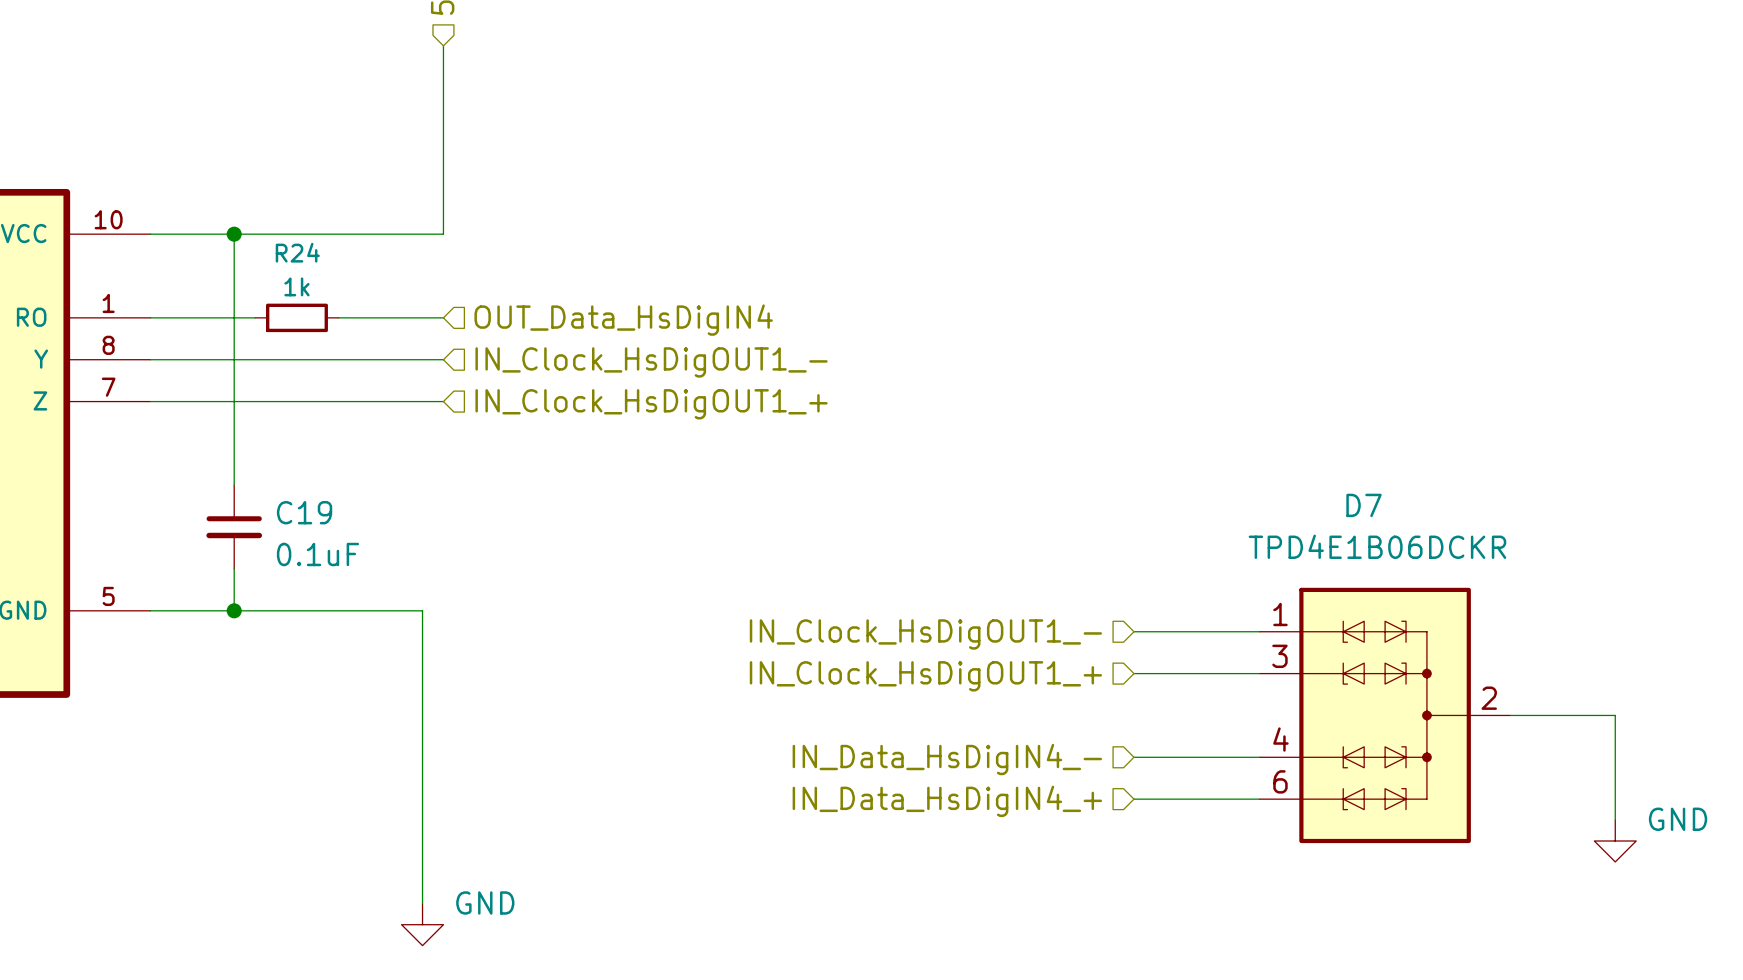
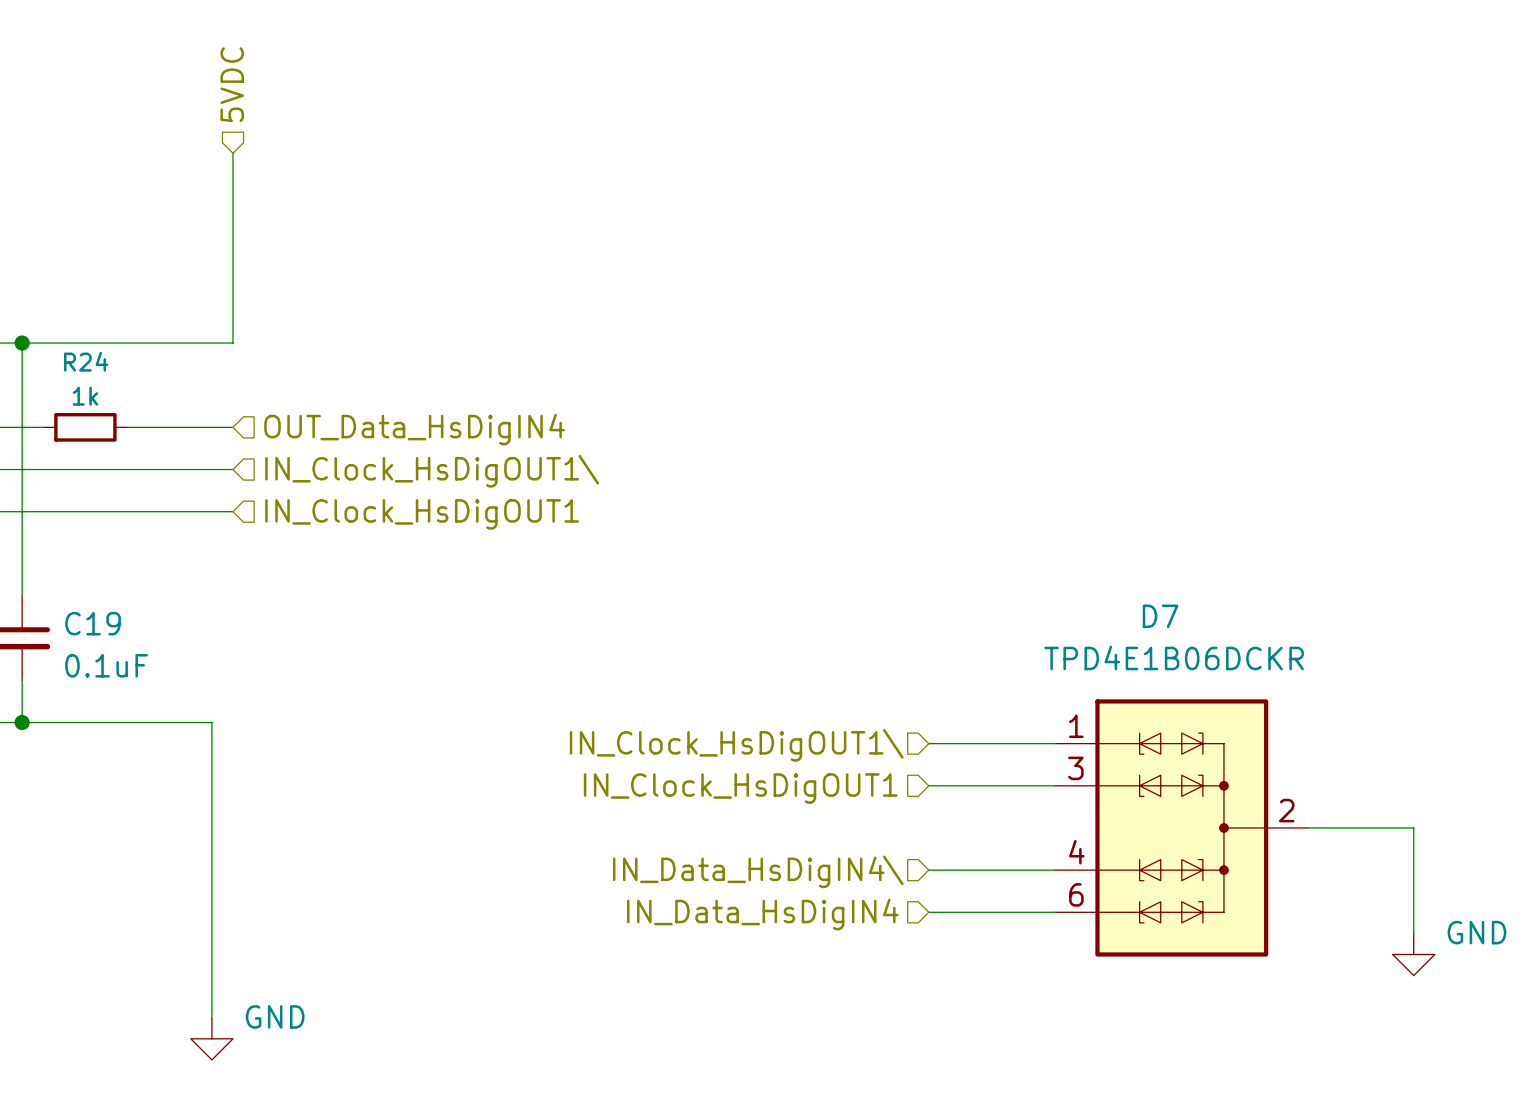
hierarchical label: IN_Clock_HsDigOUT1_- (651, 362) -> IN_Clock_HsDigOUT1\ (432, 471)
hierarchical label: IN_Clock_HsDigOUT1_+ (651, 404) -> IN_Clock_HsDigOUT1 (422, 514)
hierarchical label: IN_Clock_HsDigOUT1_- (925, 634) -> IN_Clock_HsDigOUT1\ (736, 745)
hierarchical label: IN_Clock_HsDigOUT1_+ (925, 676) -> IN_Clock_HsDigOUT1 (740, 788)
hierarchical label: IN_Data_HsDigIN4_- (947, 759) -> IN_Data_HsDigIN4\ (758, 871)
hierarchical label: IN_Data_HsDigIN4_+ (947, 801) -> IN_Data_HsDigIN4 (762, 914)

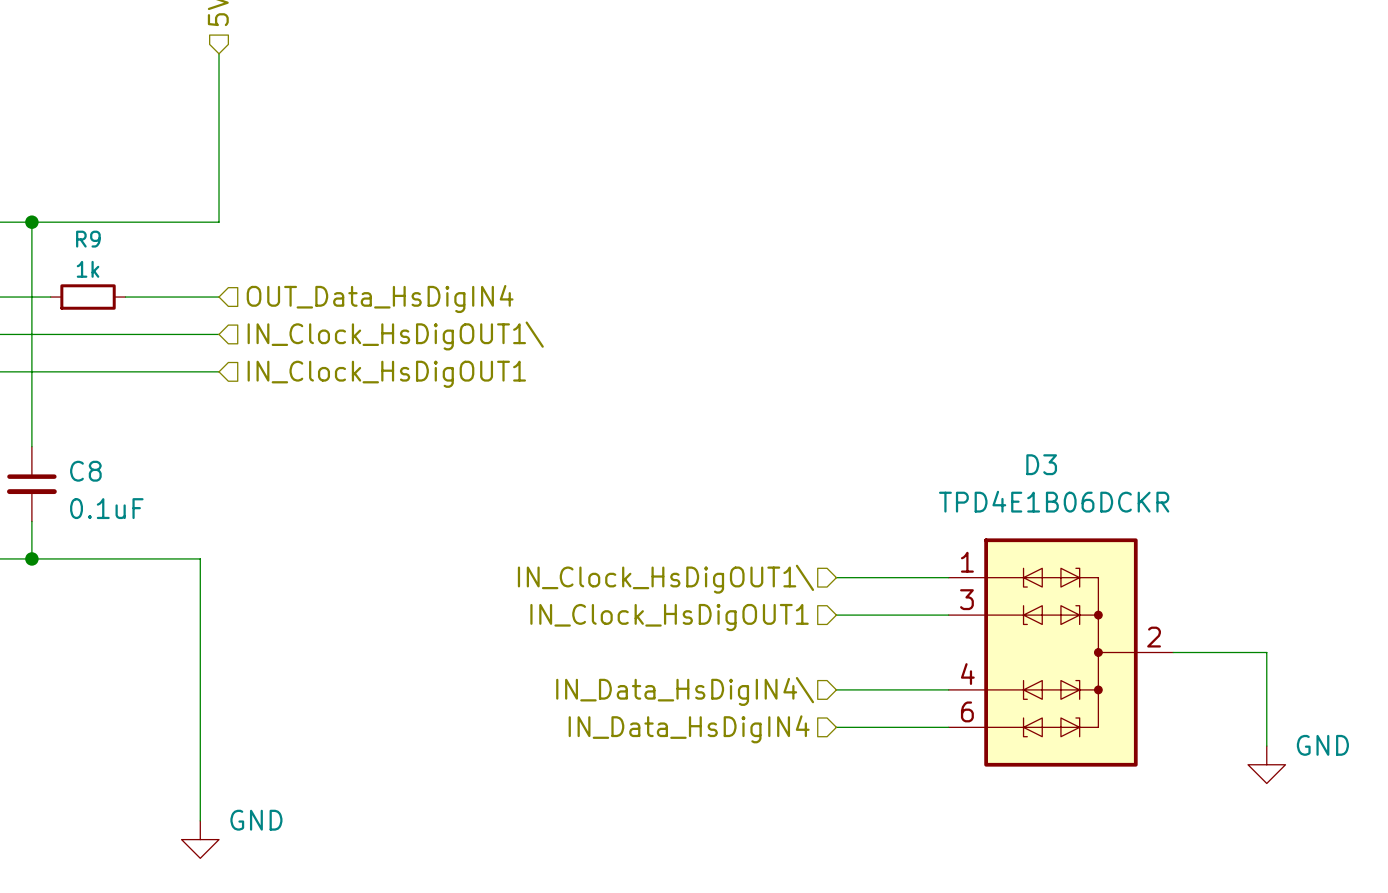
R24 name: R24 (86, 361) -> R9 (88, 239)
D7 name: D7 (1160, 616) -> D3 (1041, 464)
C19 name: C19 (93, 623) -> C8 (85, 471)

